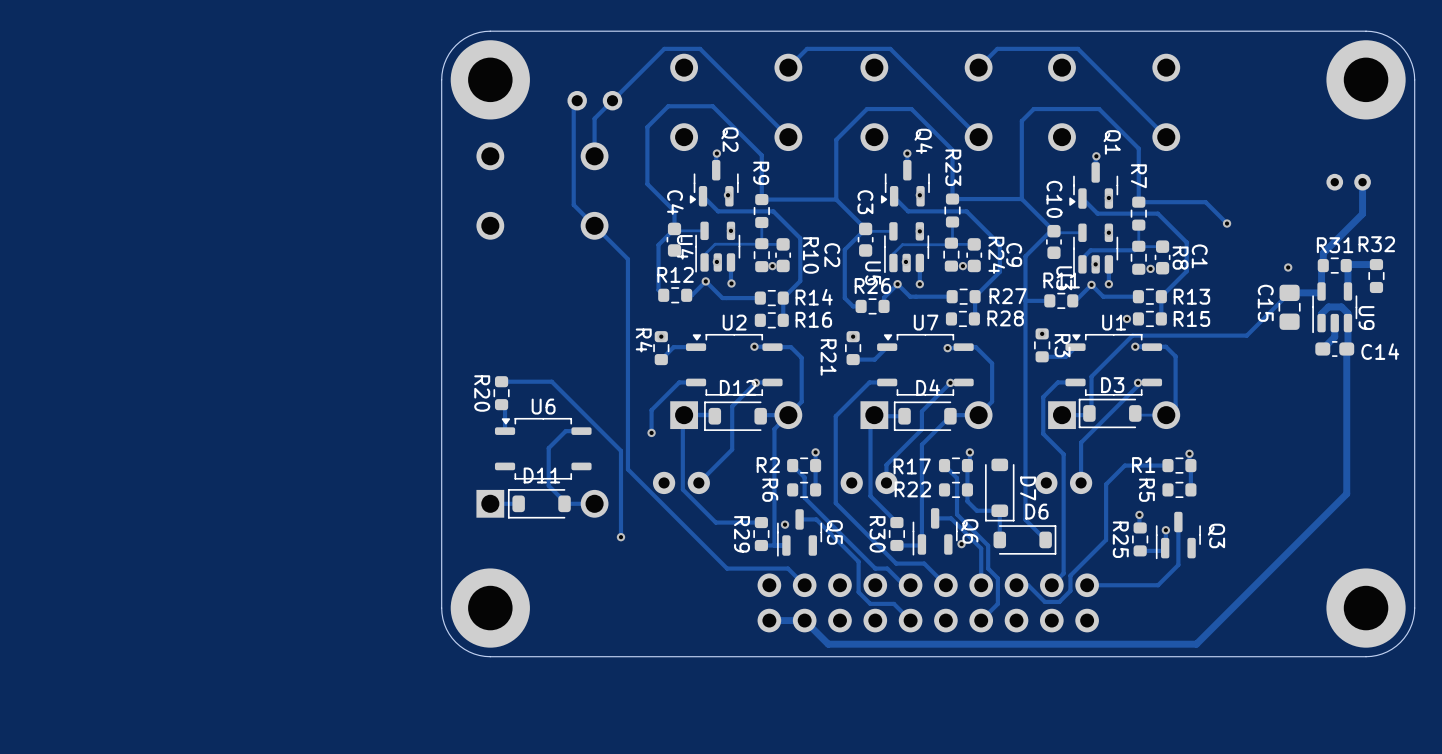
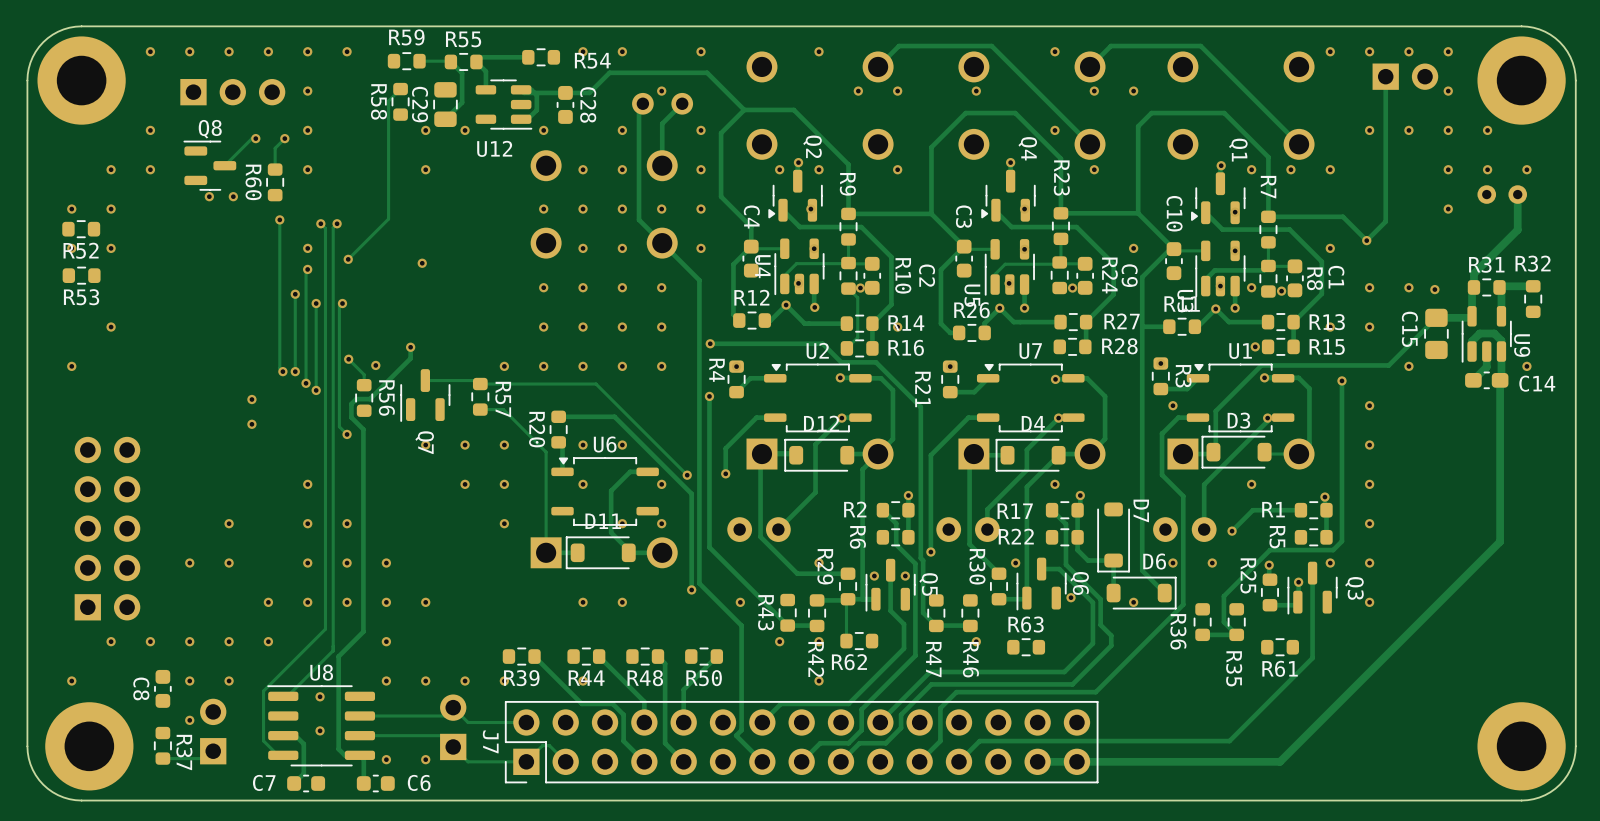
board edge: (490, 31) (474, 33) (455, 45) (446, 58) (441, 79) (441, 608) (442, 618) (449, 633) (464, 649) (479, 655) (490, 656) (1366, 656) (1382, 653) (1400, 642) (1409, 629) (1414, 608) -> (546, 26) (81, 26) (58, 31) (43, 42) (35, 51) (30, 62) (27, 80) (27, 746) (32, 769) (43, 784) (52, 792) (69, 799) (81, 800) (1527, 800) (1545, 795) (1555, 788) (1563, 780) (1572, 764) (1575, 746) (1575, 668)
via: none -> (150, 51)
via: none -> (189, 51)
via: none -> (229, 51)
via: none -> (268, 51)
via: none -> (307, 51)
via: none -> (347, 51)
via: none -> (583, 51)
via: none -> (622, 51)
via: none -> (701, 51)
via: none -> (819, 51)
via: none -> (1054, 51)
via: none -> (1330, 51)
via: none -> (1369, 51)
via: none -> (1408, 51)
via: none -> (1448, 51)
track: none -> (528, 57) (481, 57) (476, 61) (485, 71) (485, 89)
R54: none -> (541, 57)
R59: none -> (406, 61)
track: none -> (419, 61) (450, 61) (462, 73) (462, 102) (445, 119)
R55: none -> (463, 61)
track: none -> (1385, 76) (1385, 221) (1366, 240)
part: none -> (1405, 76)
part: none -> (81, 80)
part: (490, 79) -> none
track: none -> (400, 89) (388, 101) (388, 219) (348, 259)
via: none -> (307, 91)
via: none -> (661, 91)
via: none -> (858, 91)
via: none -> (897, 91)
via: none -> (976, 91)
via: none -> (1094, 91)
via: none -> (1133, 91)
via: none -> (1448, 91)
part: none -> (232, 92)
R58: none -> (400, 101)
track: (612, 100) (664, 48) (700, 48) (788, 137) -> none
C29: none -> (445, 104)
U12: none -> (504, 104)
C28: none -> (565, 104)
track: none -> (744, 109) (707, 72) (609, 72) (589, 92) (524, 92) (521, 89) (531, 89) (536, 95) (536, 110) (527, 119) (521, 119)
via: none -> (150, 130)
via: none -> (307, 130)
via: none -> (425, 130)
via: none -> (465, 130)
via: none -> (543, 130)
via: none -> (622, 130)
via: none -> (701, 130)
via: none -> (1054, 130)
via: none -> (1369, 130)
via: none -> (1408, 130)
via: none -> (1448, 130)
via: none -> (1487, 130)
track: none -> (255, 138) (251, 138) (224, 165)
via: none -> (255, 138)
track: none -> (284, 138) (275, 148) (275, 169)
via: none -> (284, 138)
Q8: none -> (209, 165)
via: none -> (111, 169)
via: none -> (150, 169)
via: none -> (307, 169)
via: none -> (425, 169)
via: none -> (583, 169)
via: none -> (622, 169)
via: none -> (701, 169)
via: none -> (779, 169)
via: none -> (819, 169)
via: none -> (897, 169)
via: none -> (1094, 169)
via: none -> (1251, 169)
via: none -> (1290, 169)
via: none -> (1330, 169)
via: none -> (1448, 169)
via: none -> (1487, 169)
via: none -> (1526, 169)
R60: none -> (275, 182)
via: none -> (209, 196)
via: none -> (233, 196)
via: none -> (71, 209)
via: none -> (111, 209)
via: none -> (543, 209)
via: none -> (583, 209)
via: none -> (622, 209)
via: none -> (661, 209)
via: none -> (701, 209)
via: none -> (1448, 209)
track: none -> (279, 219) (279, 368) (282, 371)
via: none -> (279, 219)
track: none -> (320, 223) (325, 228) (325, 629) (263, 691) (263, 740) (277, 755) (283, 755)
via: none -> (320, 223)
track: none -> (337, 223) (333, 227) (333, 651)
via: none -> (337, 223)
R52: none -> (81, 229)
via: none -> (71, 248)
via: none -> (111, 248)
via: none -> (307, 248)
via: none -> (583, 248)
via: none -> (622, 248)
via: none -> (701, 248)
via: none -> (1133, 248)
via: none -> (1330, 248)
via: none -> (348, 259)
via: none -> (422, 263)
track: none -> (307, 269) (306, 271) (306, 383)
via: none -> (307, 269)
R53: none -> (81, 275)
via: none -> (543, 287)
via: none -> (583, 287)
via: none -> (622, 287)
via: none -> (661, 287)
via: none -> (1251, 287)
via: none -> (1369, 287)
via: none -> (1408, 287)
track: none -> (848, 288) (857, 297) (857, 337) (846, 348)
track: none -> (295, 294) (295, 371)
via: none -> (295, 294)
track: none -> (316, 303) (316, 390)
via: none -> (316, 303)
track: none -> (342, 303) (339, 306) (339, 426) (347, 434)
via: none -> (342, 303)
via: none -> (111, 327)
via: none -> (543, 327)
via: none -> (583, 327)
via: none -> (622, 327)
via: none -> (661, 327)
via: none -> (897, 327)
via: none -> (1330, 327)
via: none -> (1369, 327)
track: none -> (710, 343) (822, 343) (841, 362) (876, 362) (920, 407) (920, 558) (923, 560) (923, 612) (936, 625)
via: none -> (710, 343)
track: none -> (410, 347) (410, 358) (369, 399) (356, 399) (351, 404) (351, 417) (363, 429) (363, 631) (338, 656) (338, 749) (344, 755) (359, 755) (363, 759) (363, 783)
via: none -> (410, 347)
track: none -> (348, 359) (364, 374) (364, 385)
via: none -> (348, 359)
via: none -> (375, 365)
via: none -> (71, 366)
via: none -> (504, 366)
via: none -> (543, 366)
via: none -> (583, 366)
via: none -> (622, 366)
via: none -> (661, 366)
via: none -> (1408, 366)
via: none -> (1526, 366)
via: none -> (282, 371)
via: none -> (295, 371)
track: none -> (425, 380) (476, 380) (480, 384) (596, 384) (687, 475)
track: none -> (1341, 380) (1341, 541) (1333, 550) (1270, 550) (1223, 596) (1223, 622) (1236, 634) (1202, 634)
via: none -> (1341, 380)
via: none -> (306, 383)
via: none -> (316, 390)
Q7: none -> (425, 395)
R57: none -> (480, 396)
track: none -> (709, 396) (709, 547) (787, 625) (817, 625)
via: none -> (709, 396)
R56: none -> (364, 397)
via: none -> (251, 399)
via: none -> (1172, 405)
via: none -> (1369, 405)
track: none -> (480, 409) (503, 409) (546, 452) (546, 552)
via: none -> (251, 424)
via: none -> (347, 434)
via: none -> (425, 445)
via: none -> (465, 445)
via: none -> (504, 445)
via: none -> (583, 445)
via: none -> (622, 445)
via: none -> (1369, 445)
via: none -> (687, 475)
via: none -> (307, 484)
via: none -> (465, 484)
via: none -> (504, 484)
via: none -> (583, 484)
via: none -> (661, 484)
via: none -> (1054, 484)
via: none -> (1251, 484)
via: none -> (1369, 484)
track: (1062, 452) (1063, 573) (1051, 585) -> (1183, 496) (1183, 604) (1095, 692) (956, 692) (940, 708) (940, 741) (919, 761)
track: (627, 469) (727, 568) (788, 568) (804, 585) -> (699, 514) (699, 583) (741, 625) (741, 730) (736, 735) (762, 761)
via: none -> (229, 523)
via: none -> (307, 523)
via: none -> (347, 523)
via: none -> (504, 523)
via: none -> (622, 523)
via: none -> (661, 523)
via: none -> (1369, 523)
part: none -> (107, 528)
track: (1106, 484) (1106, 539) (1070, 575) (1070, 590) (1059, 601) (1044, 601) (1028, 585) (1016, 585) -> none
via: none -> (1232, 531)
D7 name position: D7 (1028, 488) -> D7 (1141, 510)
track: (804, 496) (875, 568) (887, 568) (903, 585) (910, 585) -> (896, 544) (915, 563) (915, 655) (861, 709) (861, 730) (848, 743) (820, 743) (801, 761)
track: (835, 503) (896, 563) (924, 563) (945, 585) -> none
via: none -> (930, 552)
via: none -> (189, 563)
via: none -> (229, 563)
via: none -> (307, 563)
via: none -> (347, 563)
via: none -> (386, 563)
via: none -> (819, 563)
via: none -> (1015, 563)
via: none -> (1172, 563)
via: none -> (1212, 563)
via: none -> (1330, 563)
via: none -> (1369, 563)
track: (799, 519) (816, 519) (858, 561) (858, 592) (870, 603) (893, 603) (910, 620) -> (890, 570) (890, 610) (904, 624) (904, 648) (848, 703) (780, 703) (762, 722)
via: none -> (905, 576)
R29 name position: R29 (742, 534) -> R29 (825, 566)
R30 name position: R30 (877, 534) -> R30 (977, 566)
R25 name position: R25 (1120, 539) -> R25 (1248, 575)
track: none -> (817, 600) (848, 599) (846, 641)
via: none -> (268, 602)
via: none -> (307, 602)
via: none -> (347, 602)
via: none -> (386, 602)
via: none -> (425, 602)
via: none -> (583, 602)
via: none -> (622, 602)
via: none -> (740, 602)
track: (981, 548) (981, 585) -> (1092, 602) (1092, 643) (1064, 672) (930, 672) (880, 722)
via: none -> (1133, 602)
via: none -> (1369, 602)
R43: none -> (787, 612)
R42: none -> (817, 613)
R47: none -> (936, 613)
R46: none -> (970, 613)
track: (1178, 564) (1158, 585) (1087, 585) -> (1312, 620) (1312, 658) (1229, 741) (979, 741) (958, 761)
R36: none -> (1202, 622)
R35: none -> (1236, 622)
track: none -> (933, 625) (967, 625)
track: (997, 578) (997, 603) (981, 620) -> (1111, 635) (1111, 645) (1072, 684) (931, 684) (901, 714) (901, 728) (885, 743) (859, 743) (841, 761)
via: none -> (111, 641)
via: none -> (150, 641)
via: none -> (189, 641)
via: none -> (229, 641)
via: none -> (268, 641)
via: none -> (386, 641)
via: none -> (779, 641)
via: none -> (819, 641)
R62: none -> (859, 641)
via: none -> (976, 641)
R63: none -> (1026, 647)
R61: none -> (1280, 647)
track: none -> (333, 650) (287, 696)
R39: none -> (521, 656)
track: none -> (534, 656) (581, 703) (612, 703) (623, 714) (623, 741) (644, 761)
R44: none -> (586, 656)
track: none -> (599, 656) (644, 701) (644, 722)
R48: none -> (645, 656)
track: none -> (657, 656) (665, 663) (665, 743) (683, 761)
R50: none -> (704, 656)
track: none -> (716, 656) (683, 689) (683, 722)
part: (928, 602) -> none
part: (490, 608) -> none
part position: (1366, 608) -> (1521, 746)
via: none -> (71, 681)
via: none -> (189, 681)
via: none -> (229, 681)
via: none -> (386, 681)
via: none -> (425, 681)
via: none -> (465, 681)
via: none -> (504, 681)
via: none -> (583, 681)
via: none -> (819, 681)
track: (769, 620) (804, 620) (828, 644) (1196, 644) -> (1037, 761) (1280, 761) (1332, 709)
C8: none -> (162, 688)
via: none -> (320, 696)
track: none -> (359, 715) (444, 715) (453, 707) (468, 722) (526, 722) (518, 730)
via: none -> (189, 720)
U8: none -> (321, 725)
part: none -> (453, 727)
via: none -> (320, 730)
part: none -> (213, 731)
track: none -> (283, 735) (295, 735) (303, 744) (303, 773) (294, 783)
track: none -> (359, 735) (441, 735) (468, 761) (526, 761) (542, 745) (549, 745) (565, 761)
J7: none -> (801, 742)
part: none -> (89, 746)
R37: none -> (162, 745)
track: none -> (213, 751) (205, 758) (162, 758)
via: none -> (386, 759)
via: none -> (425, 759)
C7: none -> (306, 783)
C6: none -> (375, 783)

